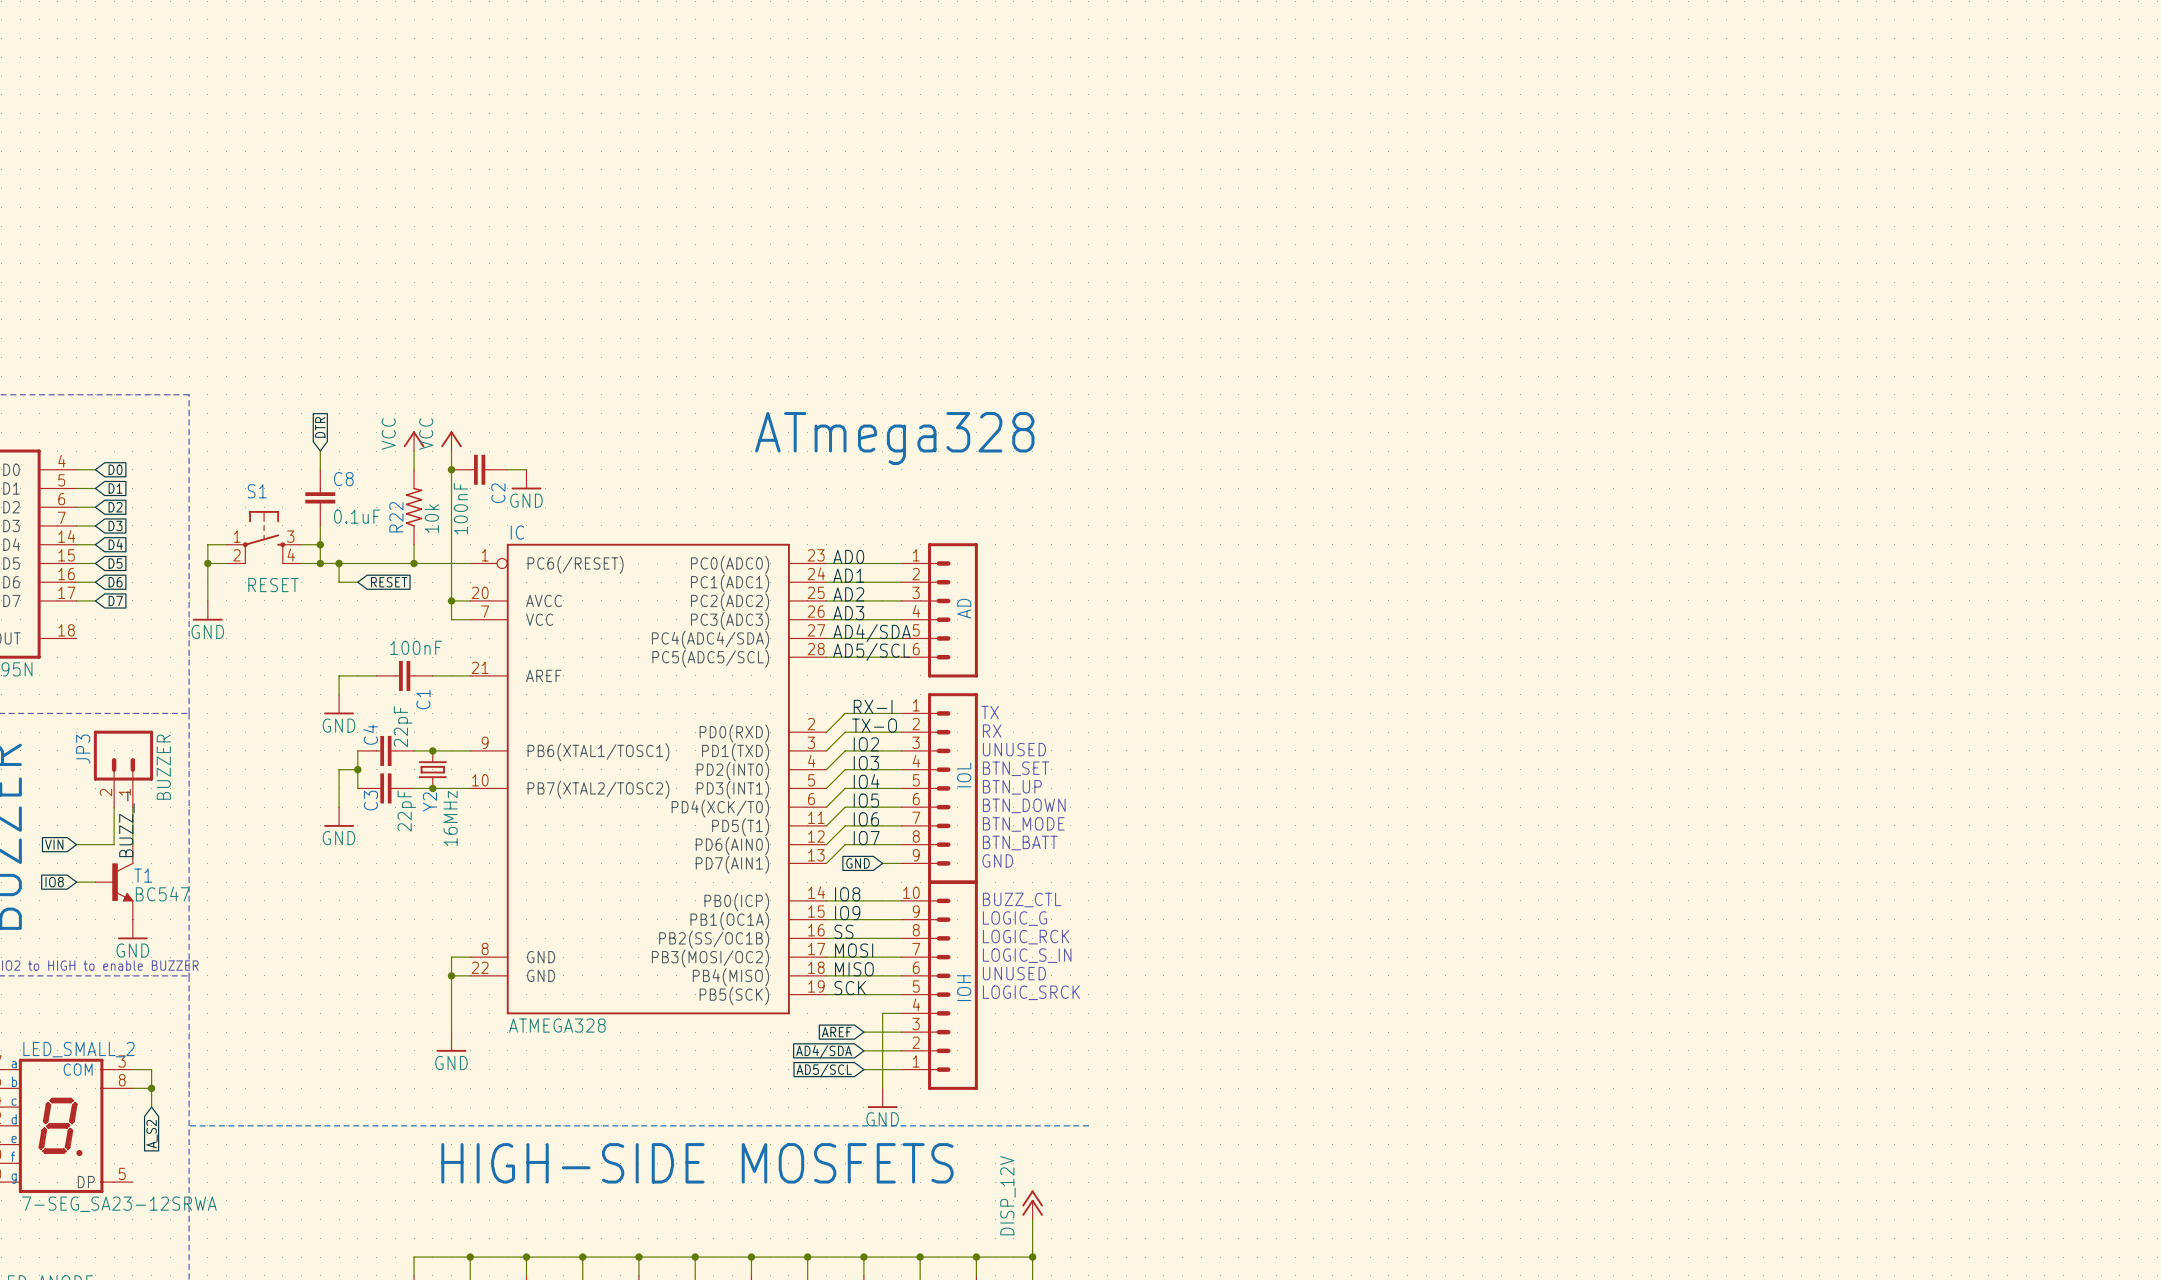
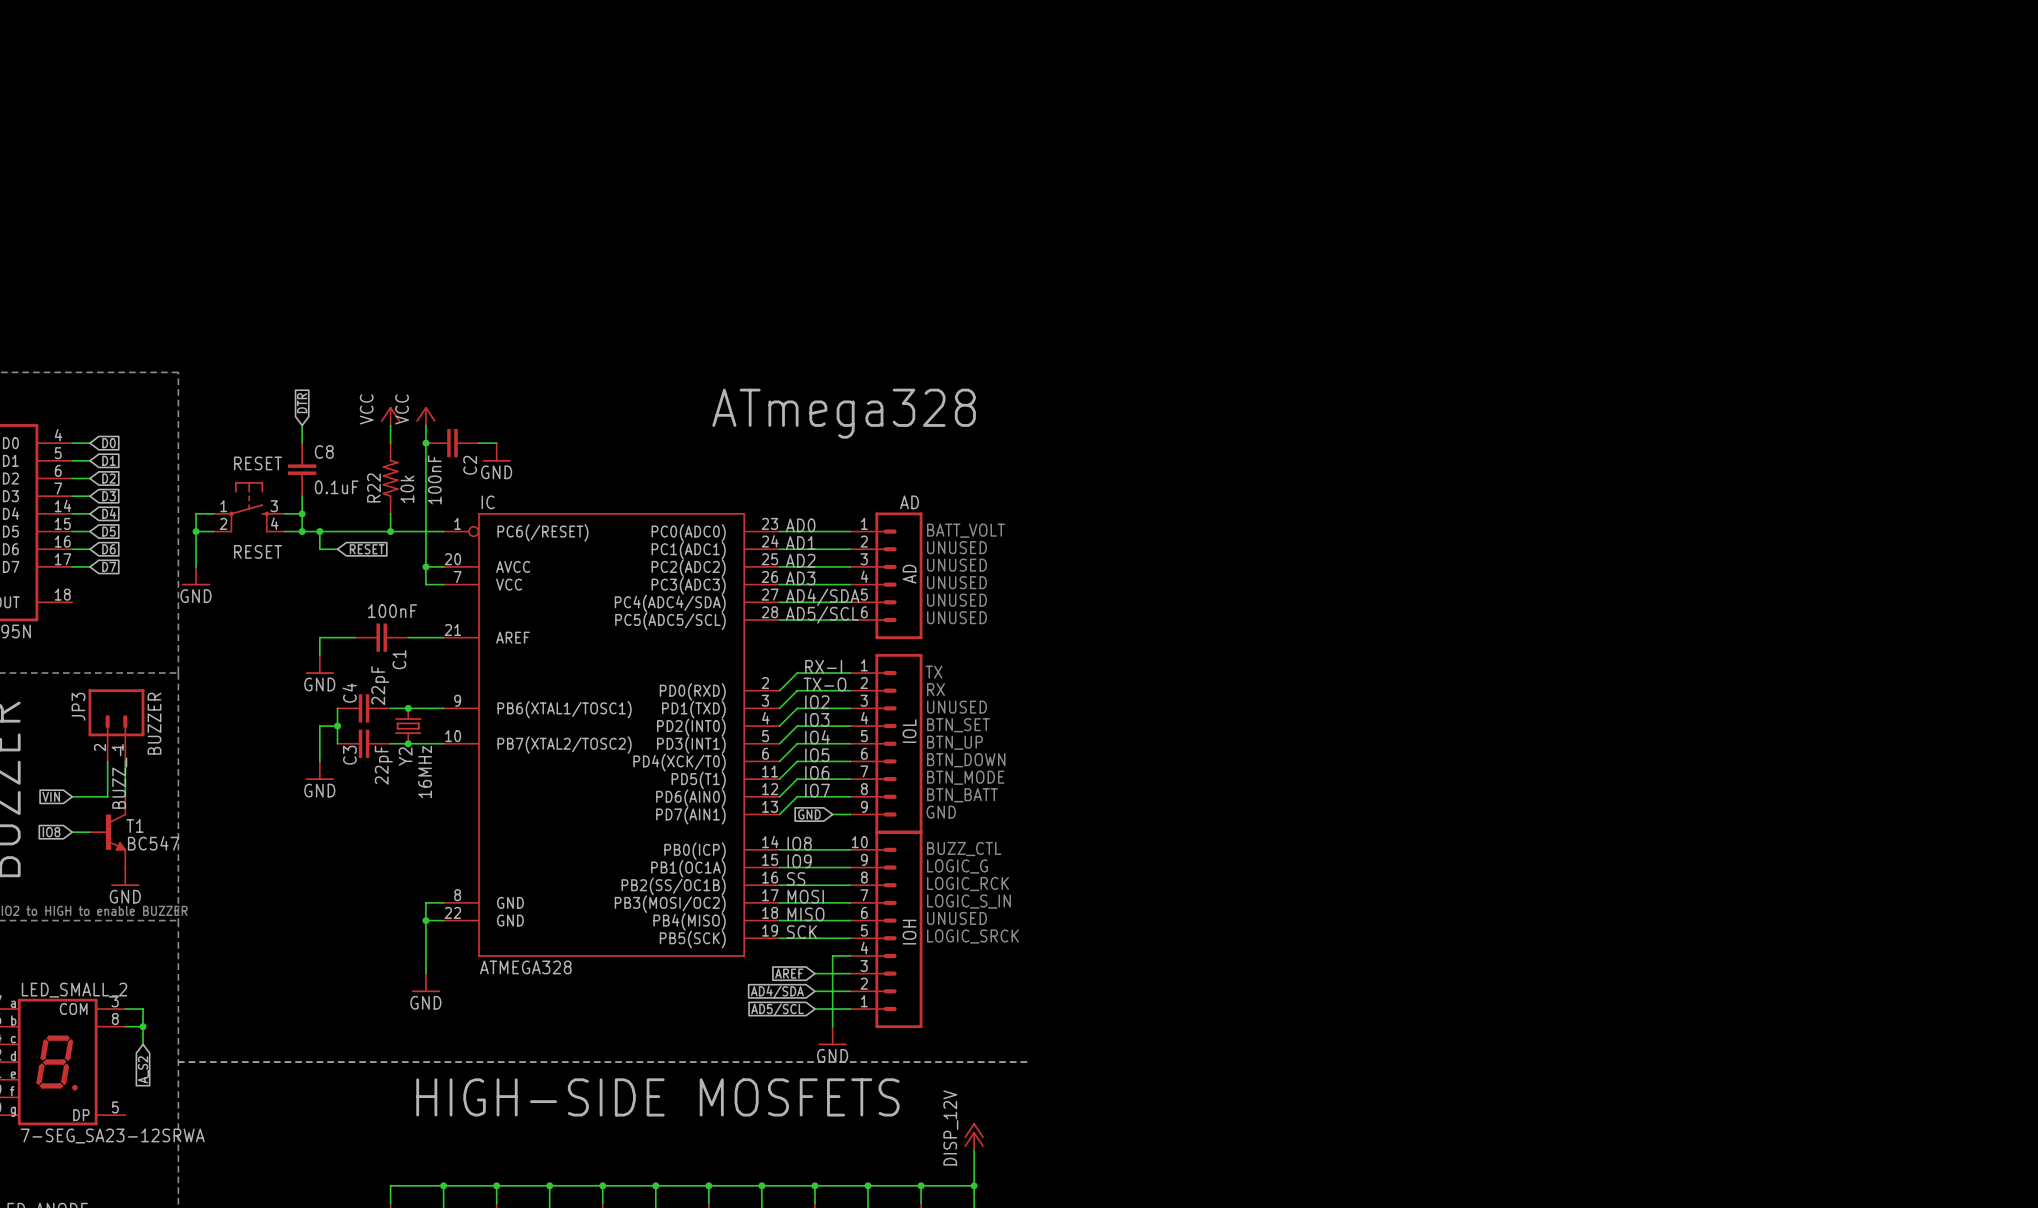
S1 name: S1 (257, 491) -> RESET (258, 463)
AD value: none -> AD (909, 502)
text: none -> BATT_VOLT (965, 530)
text: none -> UNUSED (956, 547)
text: none -> UNUSED (956, 565)
text: none -> UNUSED (956, 582)
text: none -> UNUSED (956, 600)
text: none -> UNUSED (956, 617)

